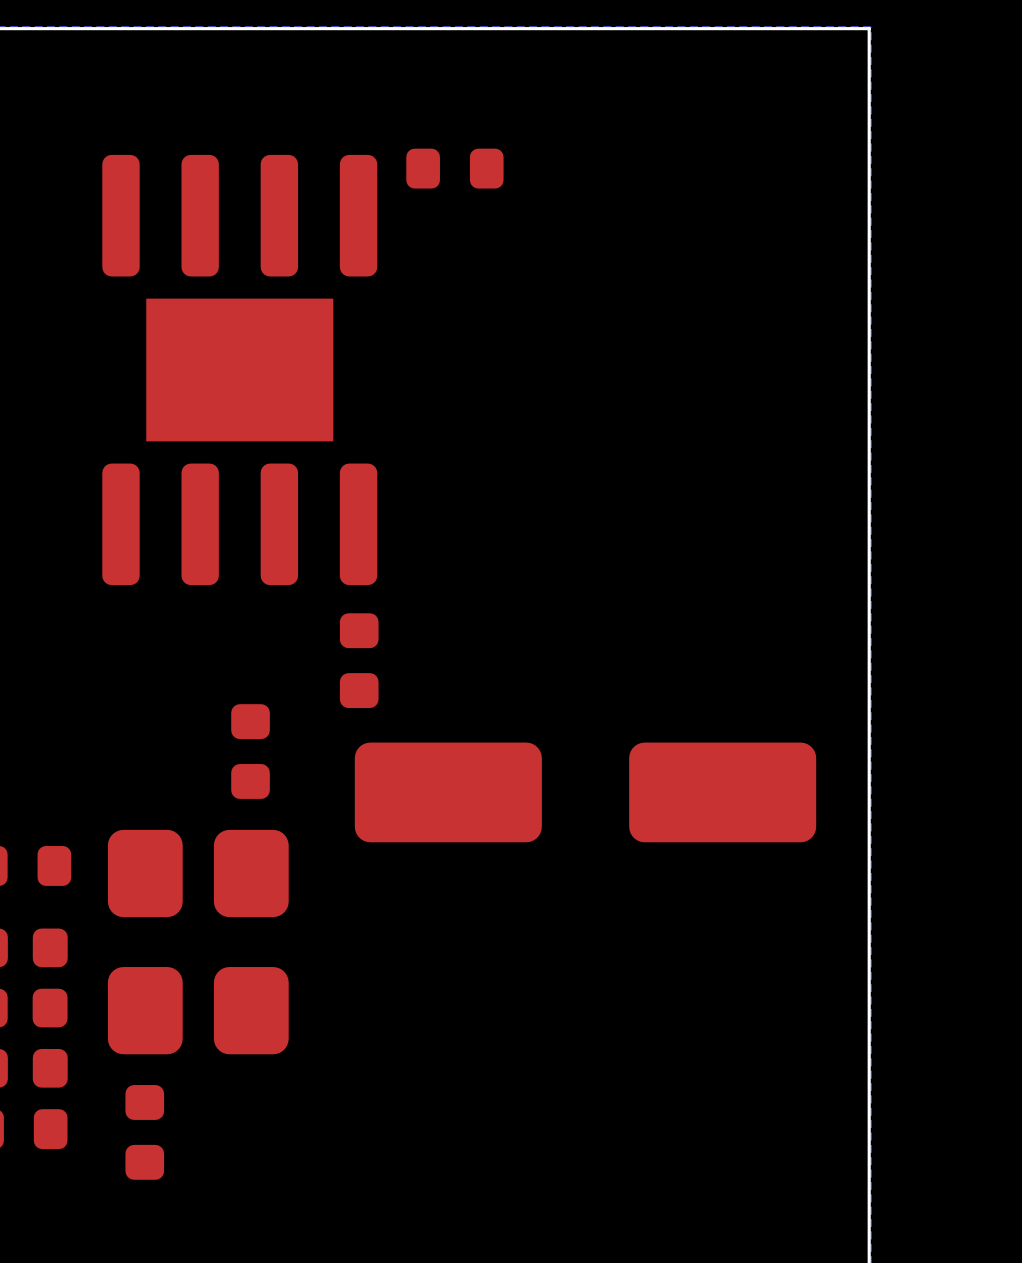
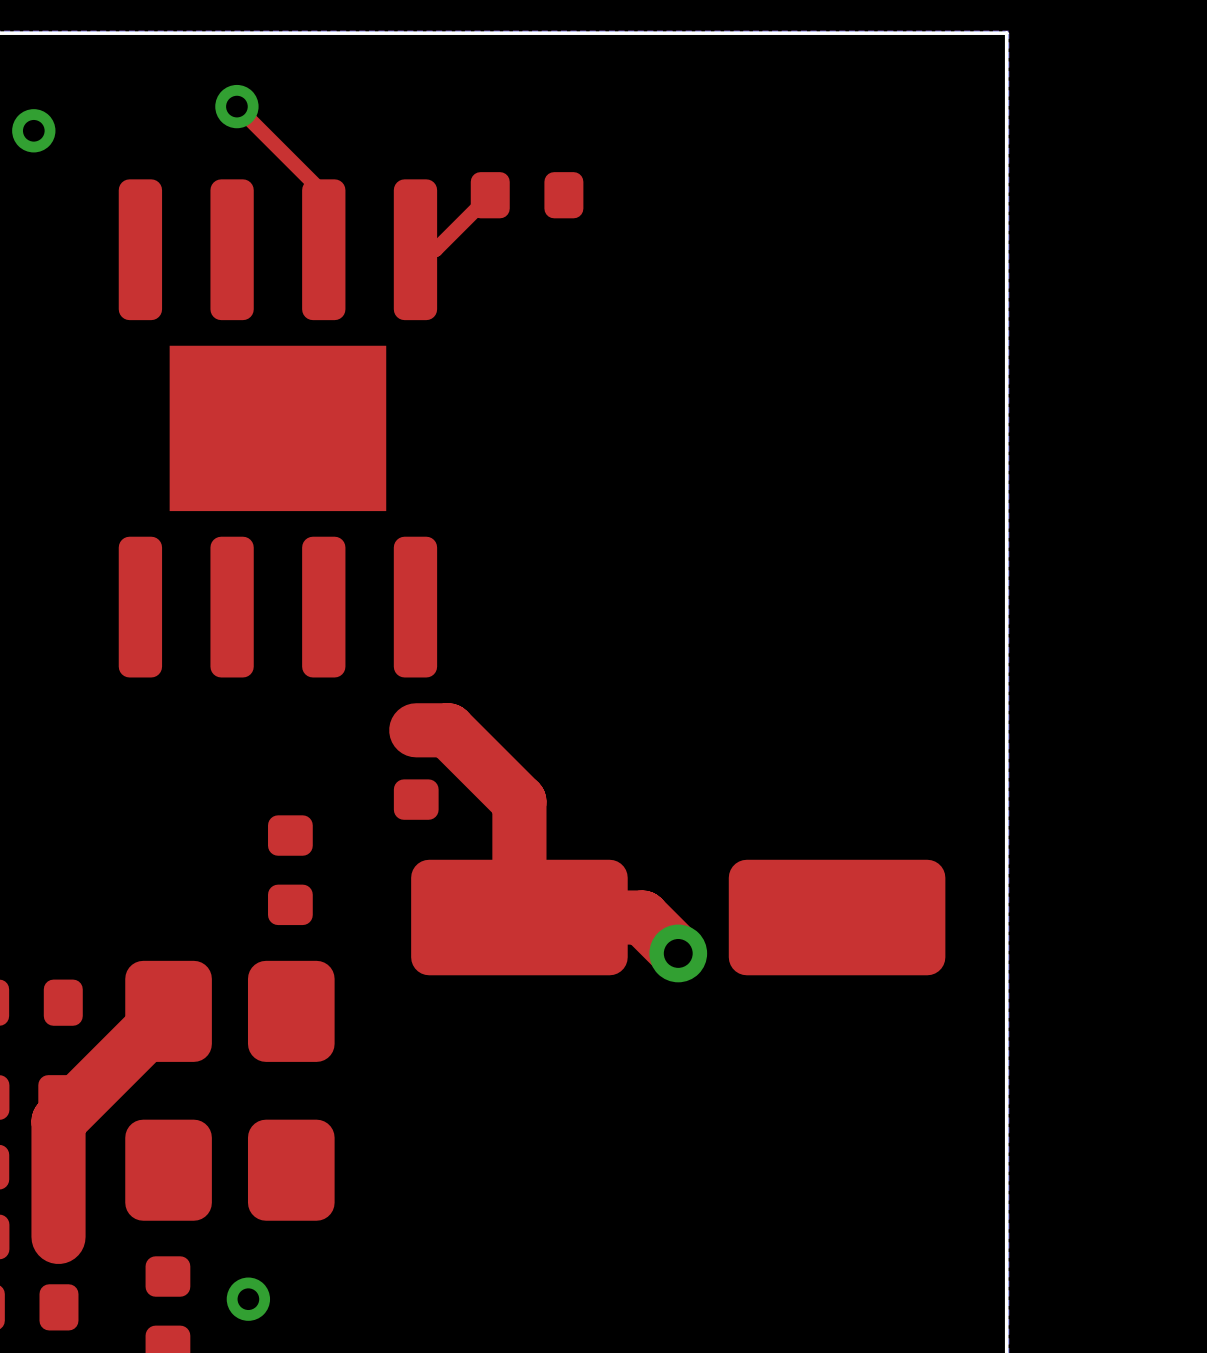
top track: none -> (236, 106) (323, 193) (323, 249)
via: none -> (236, 106)
via: none -> (33, 130)
top track: none -> (490, 195) (435, 249) (415, 249)
top track: none -> (416, 730) (448, 730) (519, 801) (519, 917) (642, 917) (678, 953)
via: none -> (678, 953)
top track: none -> (168, 1011) (58, 1121) (58, 1236)
via: none -> (248, 1299)

